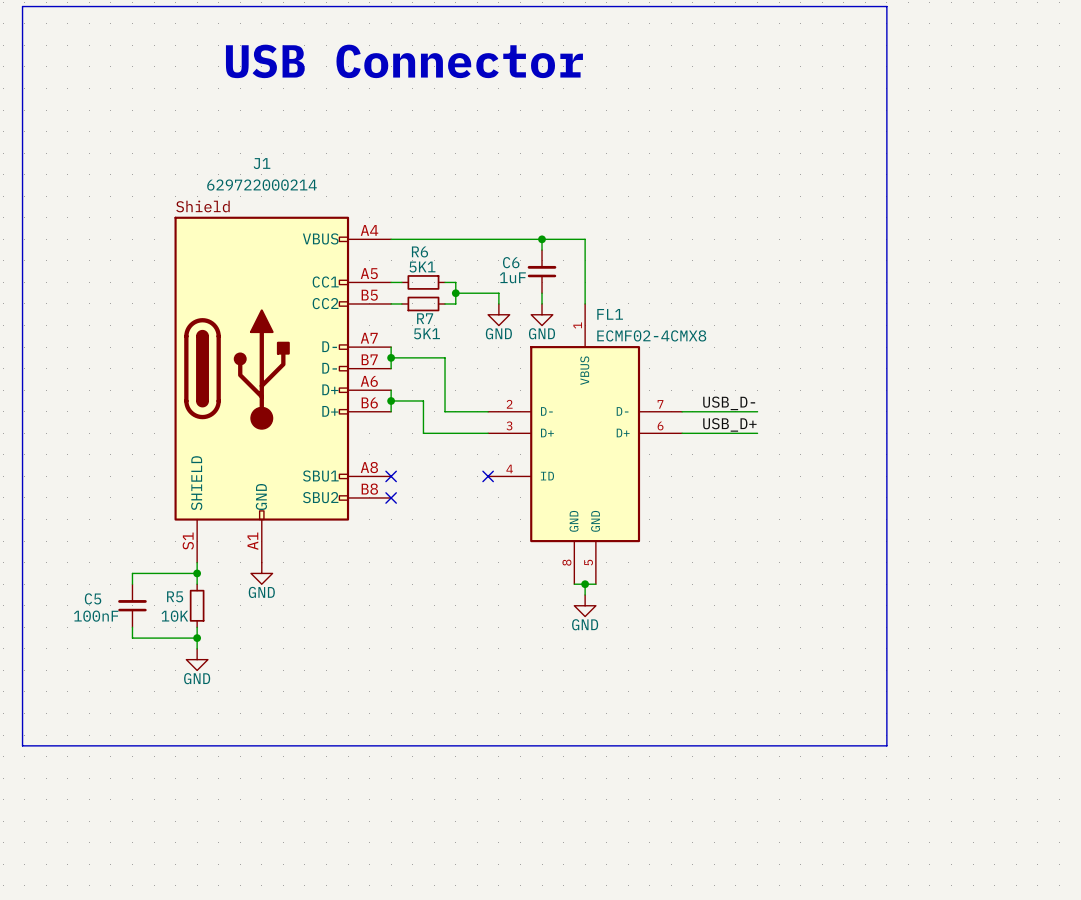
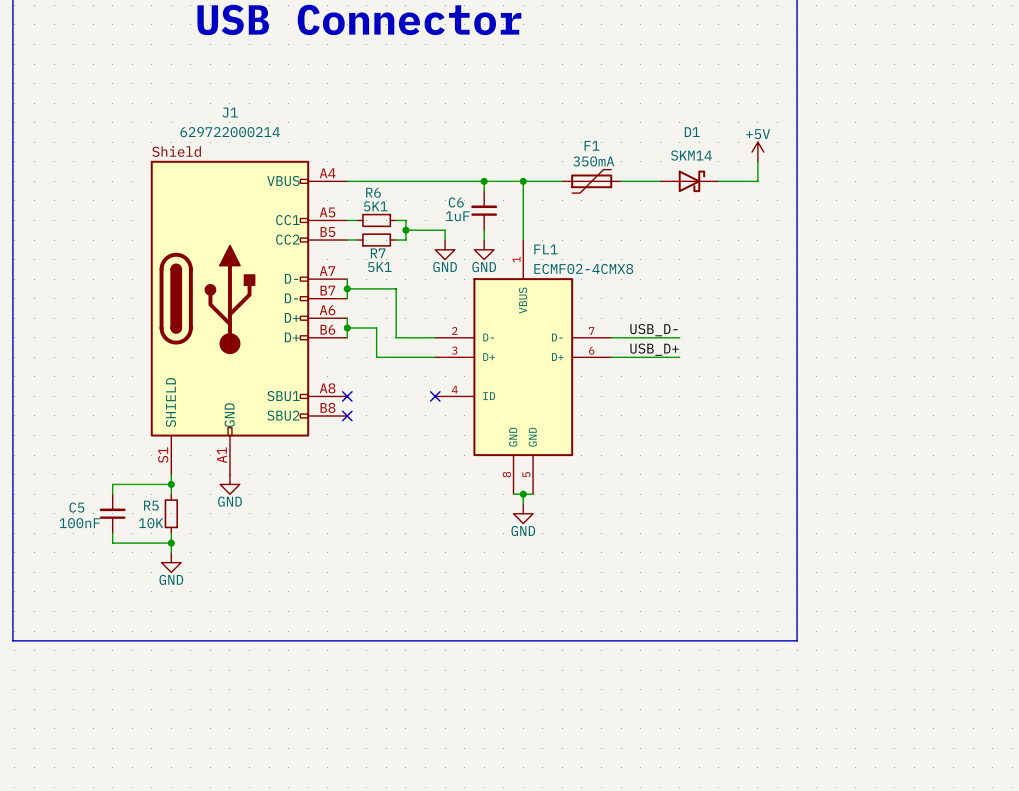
power symbol: none -> +5V (757, 152)
wire: none -> (757, 161) (757, 181) (718, 181)
wire: none -> (523, 181) (562, 181)
junction: none -> (523, 181)
F1: none -> (591, 181)
wire: none -> (621, 181) (660, 181)
D1: none -> SKM14 (689, 181)

